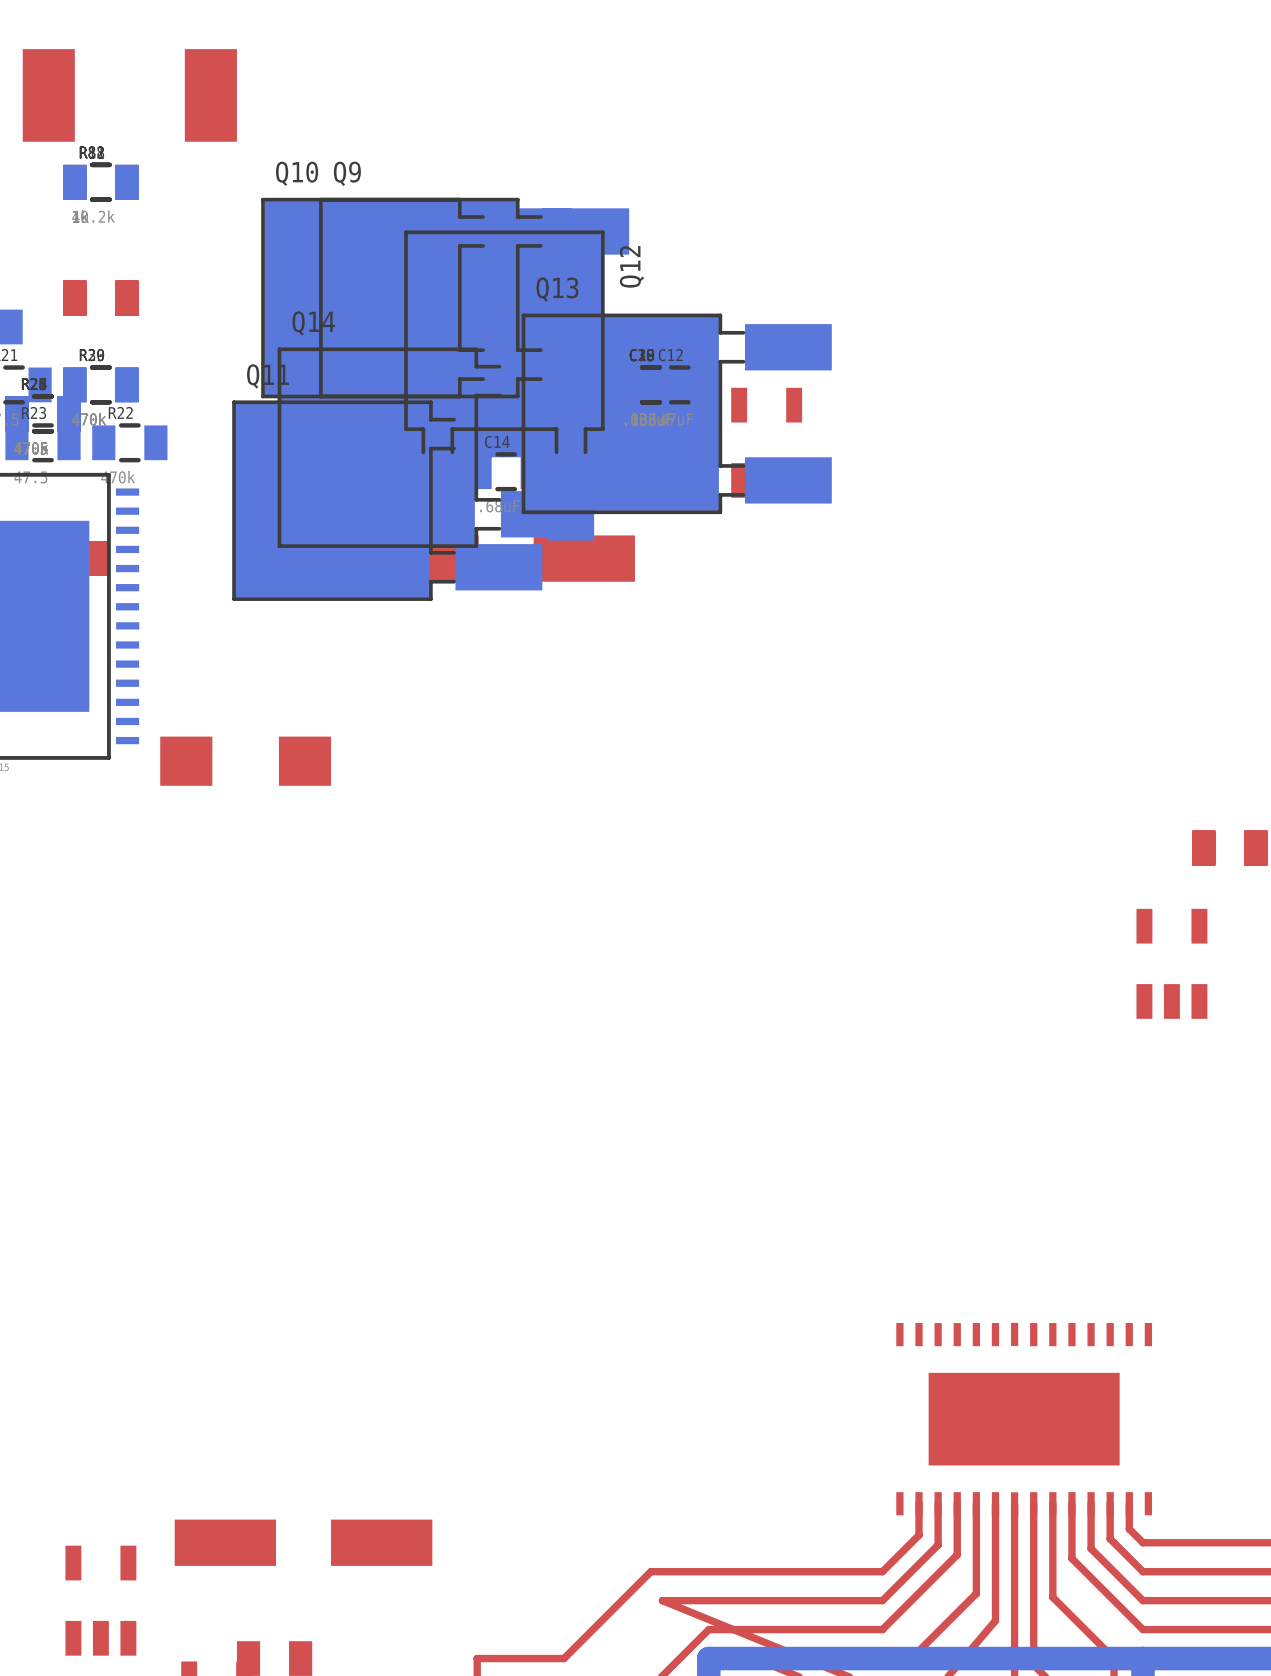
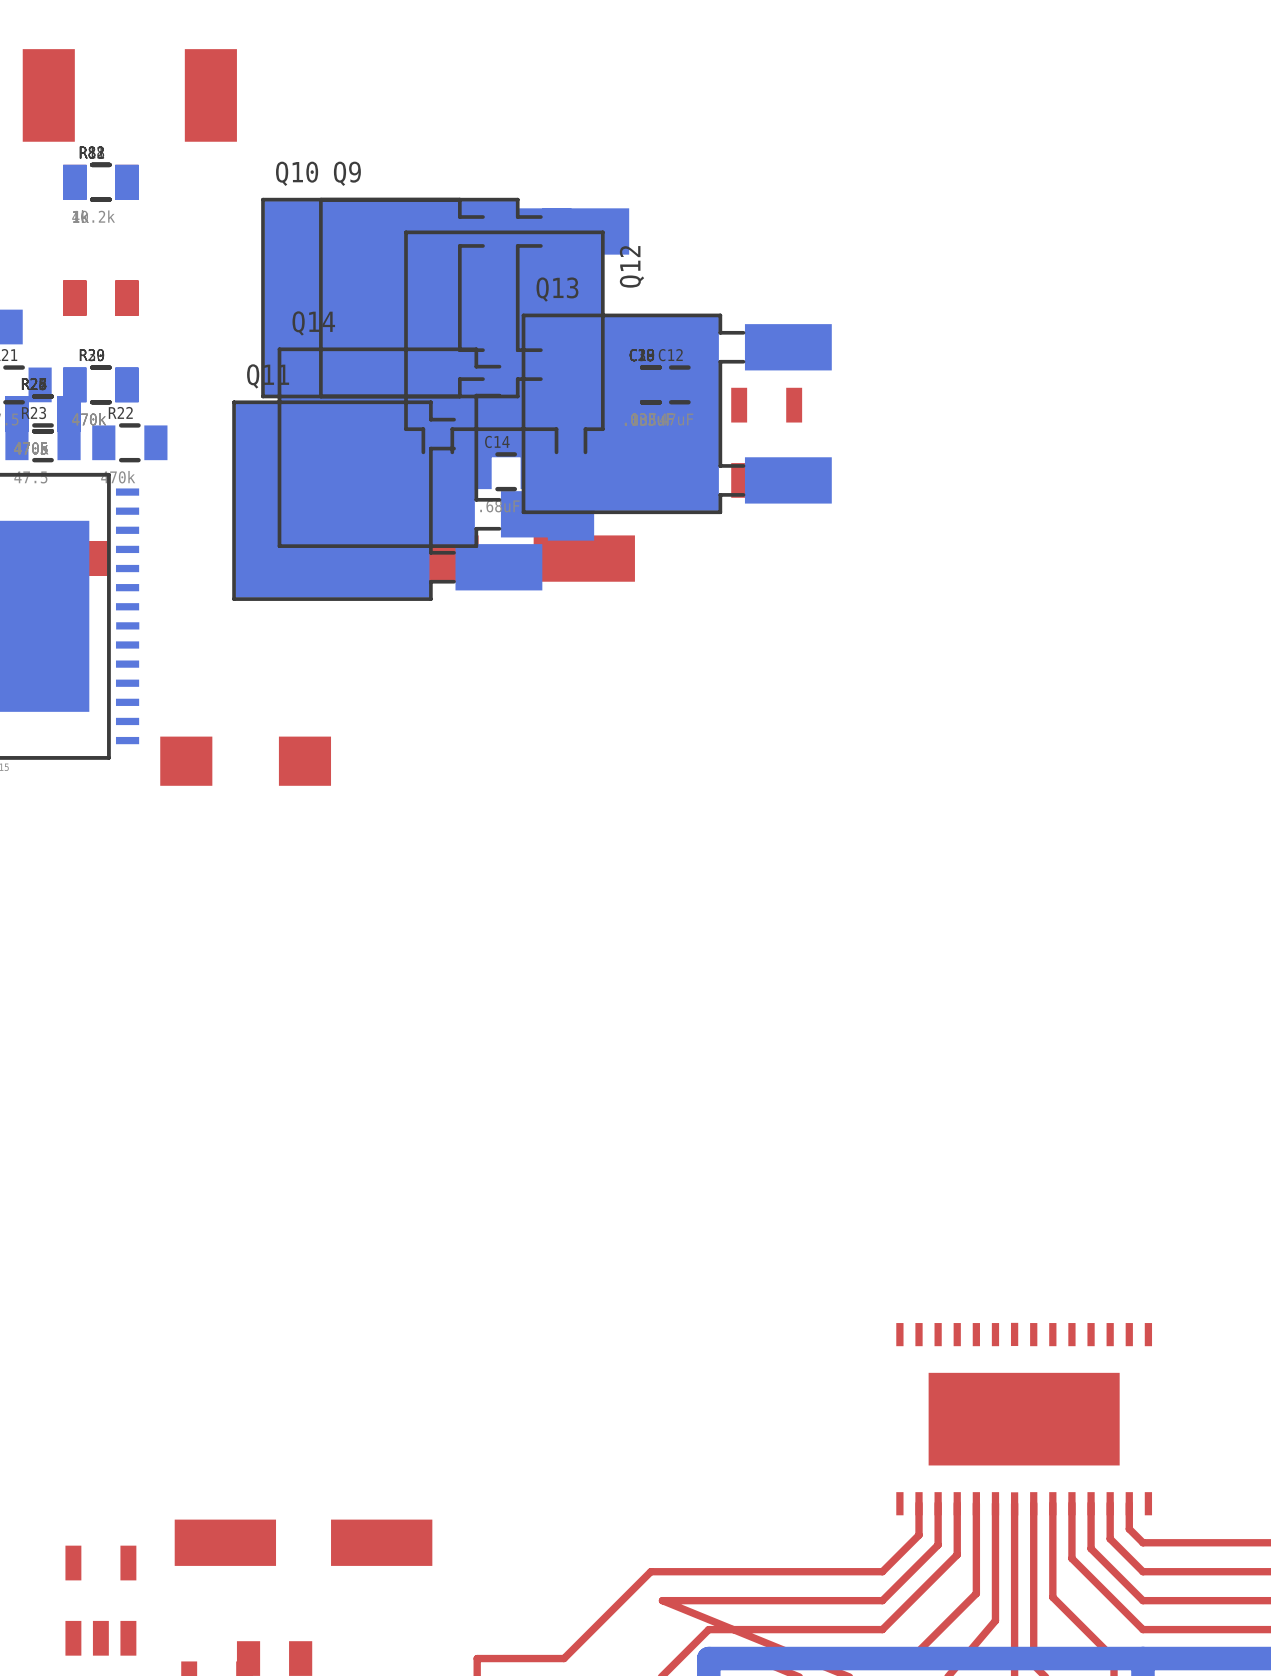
part: (1229, 848) -> none
part: (1171, 963) -> none

